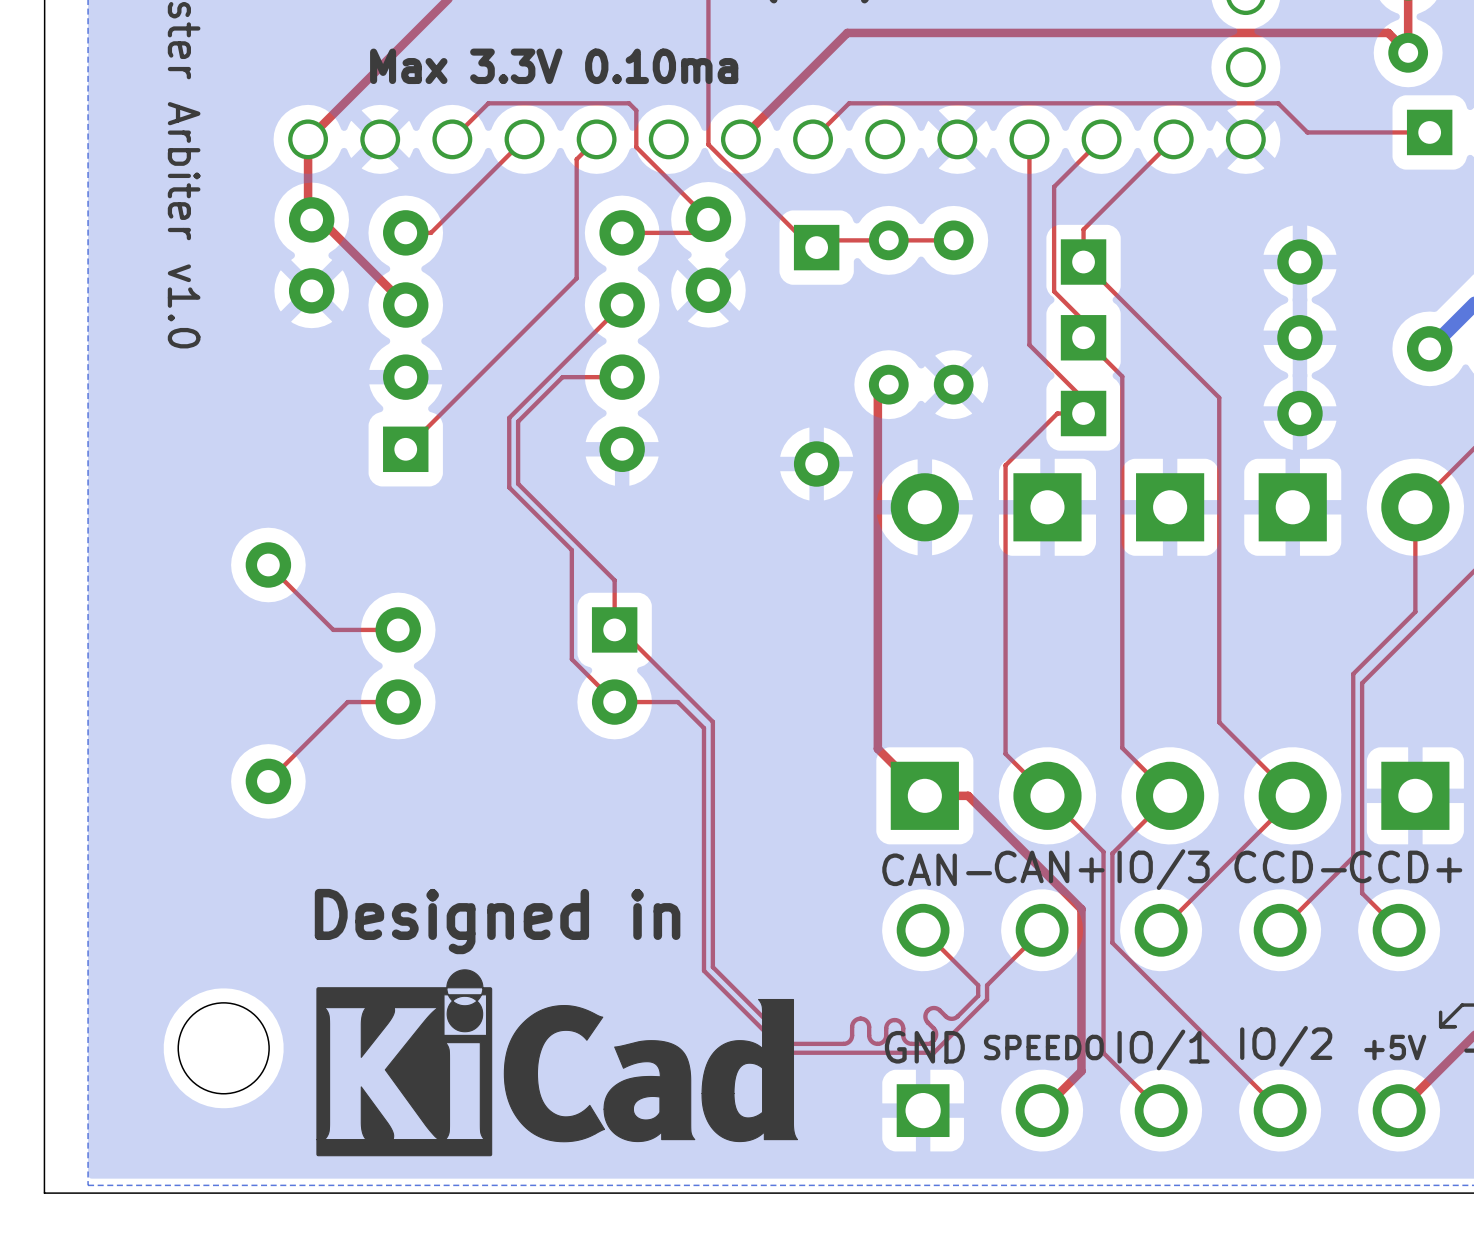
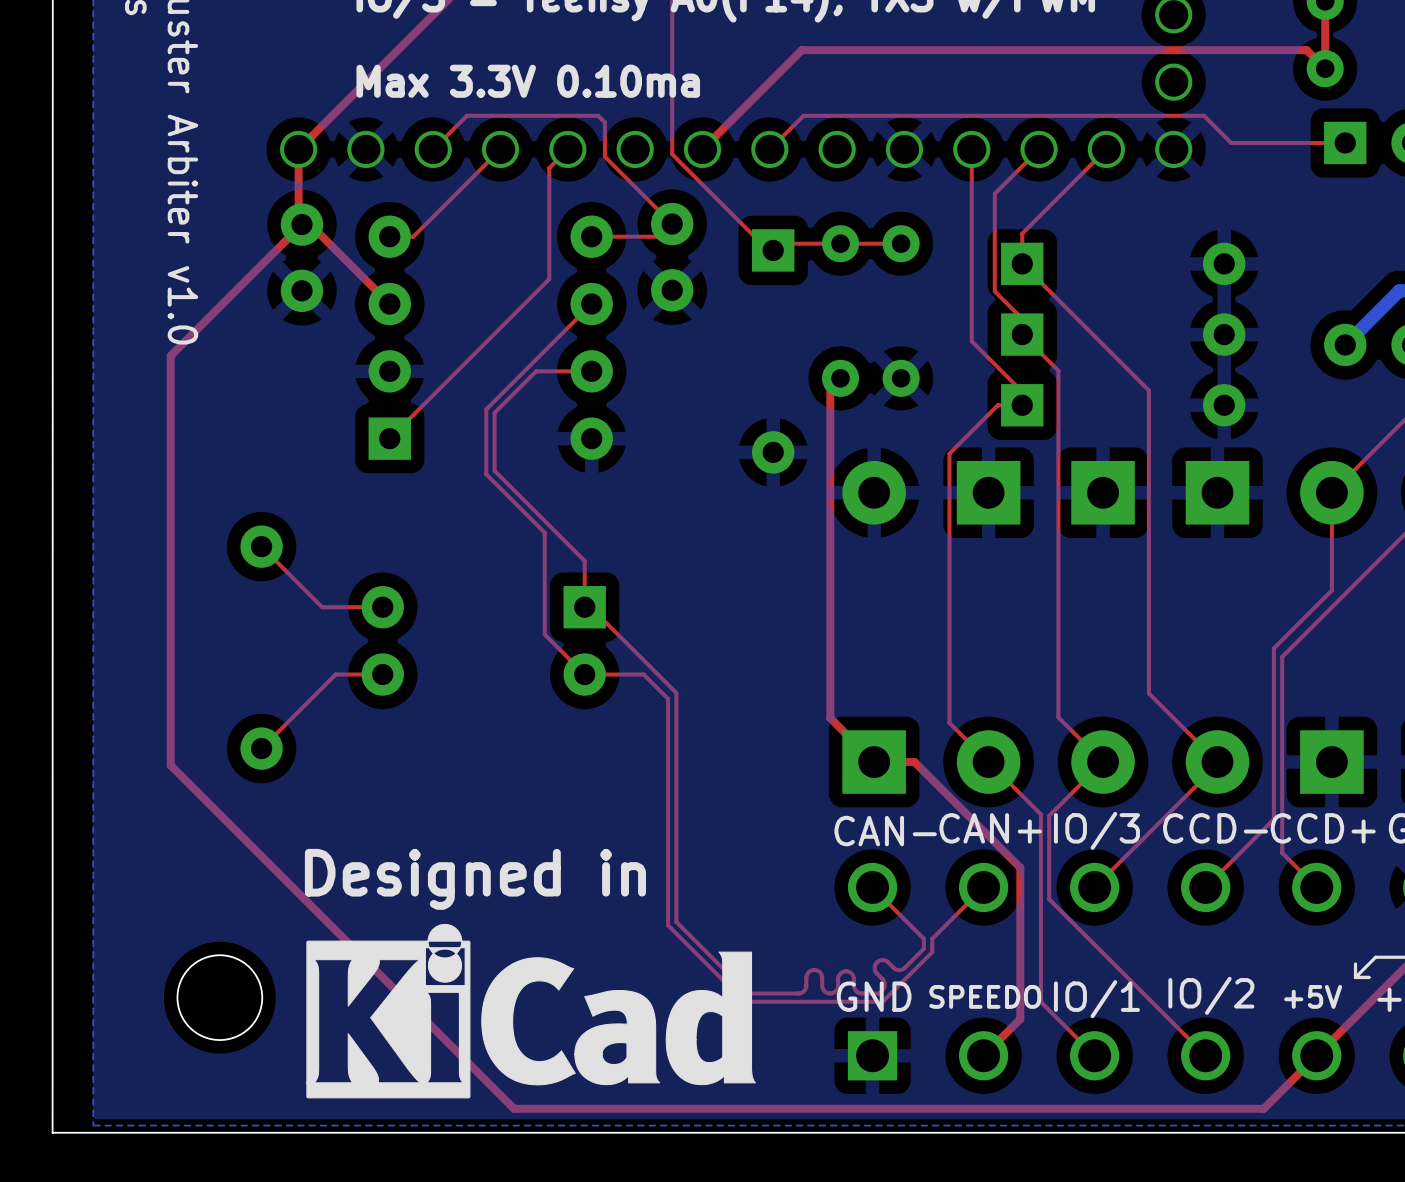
top track: none -> (301, 224) (170, 355) (170, 765) (514, 1108) (1263, 1108) (1316, 1055)

